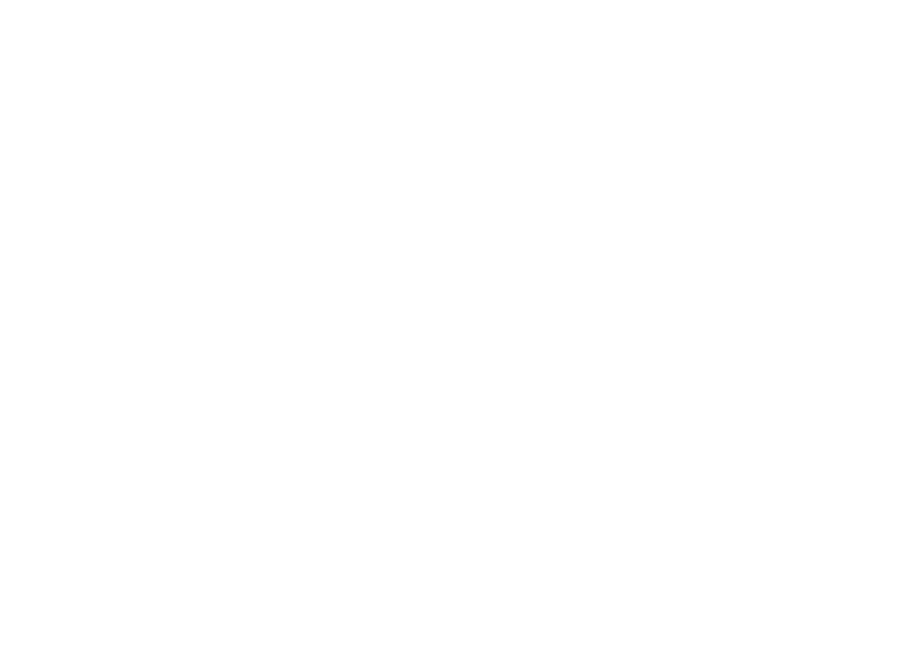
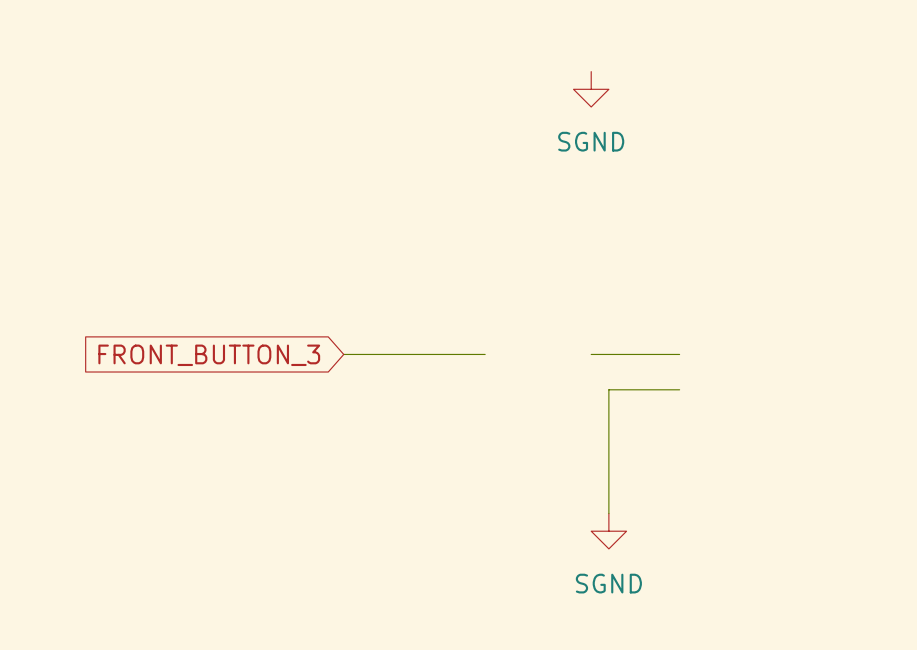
power symbol: none -> SGND (591, 89)
wire: none -> (343, 354) (485, 354)
wire: none -> (591, 354) (679, 354)
global label: none -> FRONT_BUTTON_3 (209, 355)
wire: none -> (679, 389) (608, 389) (608, 513)
power symbol: none -> SGND (608, 531)

